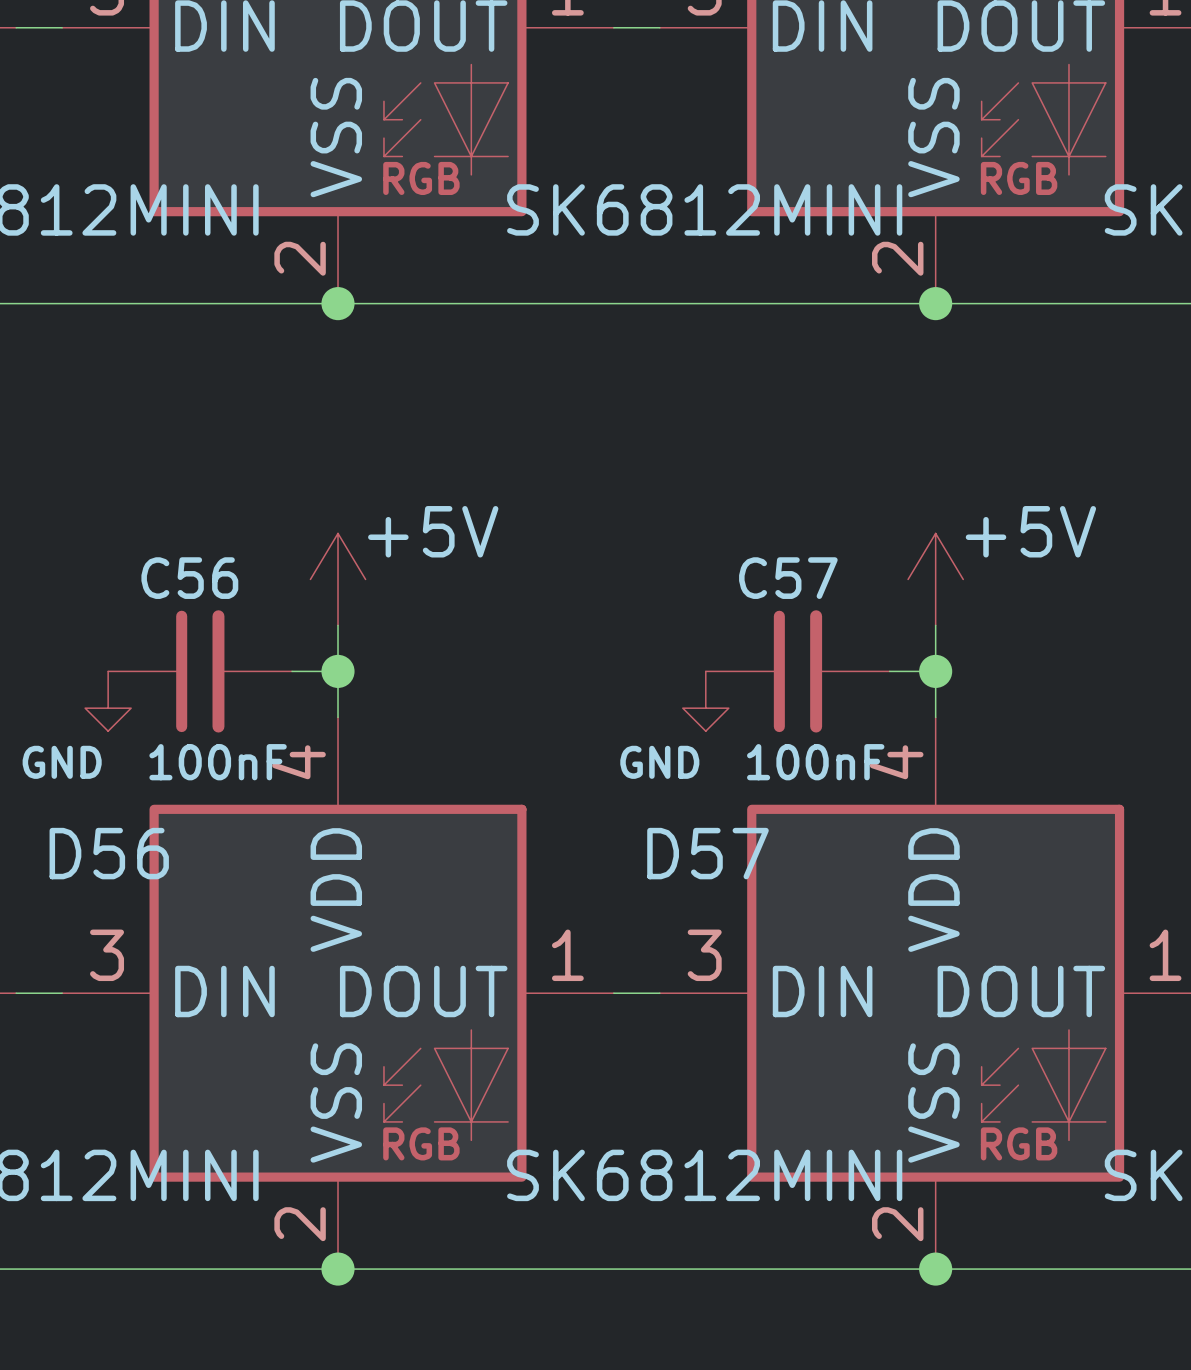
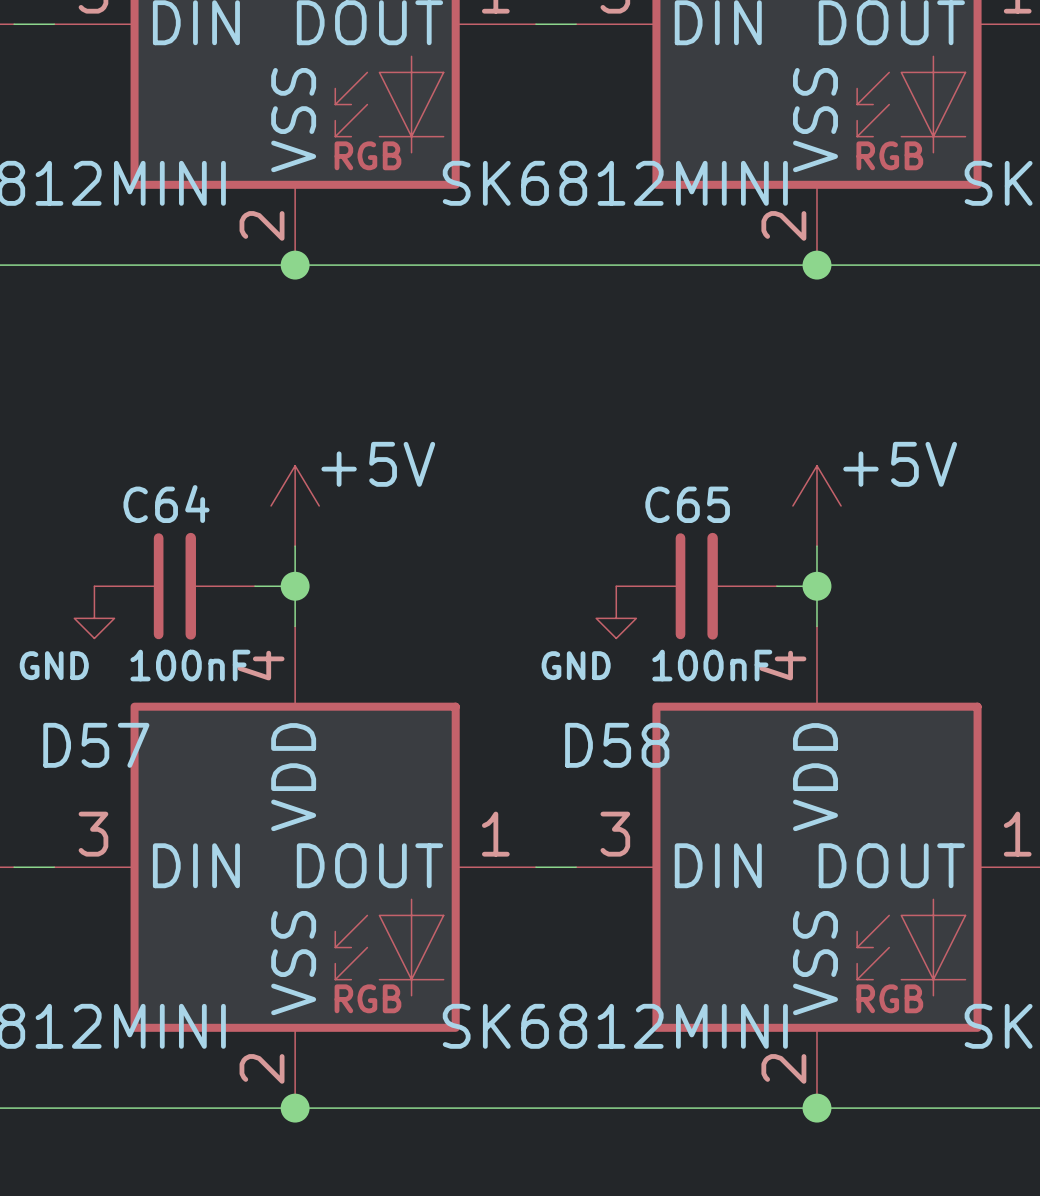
C56 name: C56 (189, 578) -> C64 (166, 504)
C57 name: C57 (788, 578) -> C65 (687, 504)
D56 name: D56 (109, 853) -> D57 (96, 745)
D57 name: D57 (707, 853) -> D58 (617, 745)

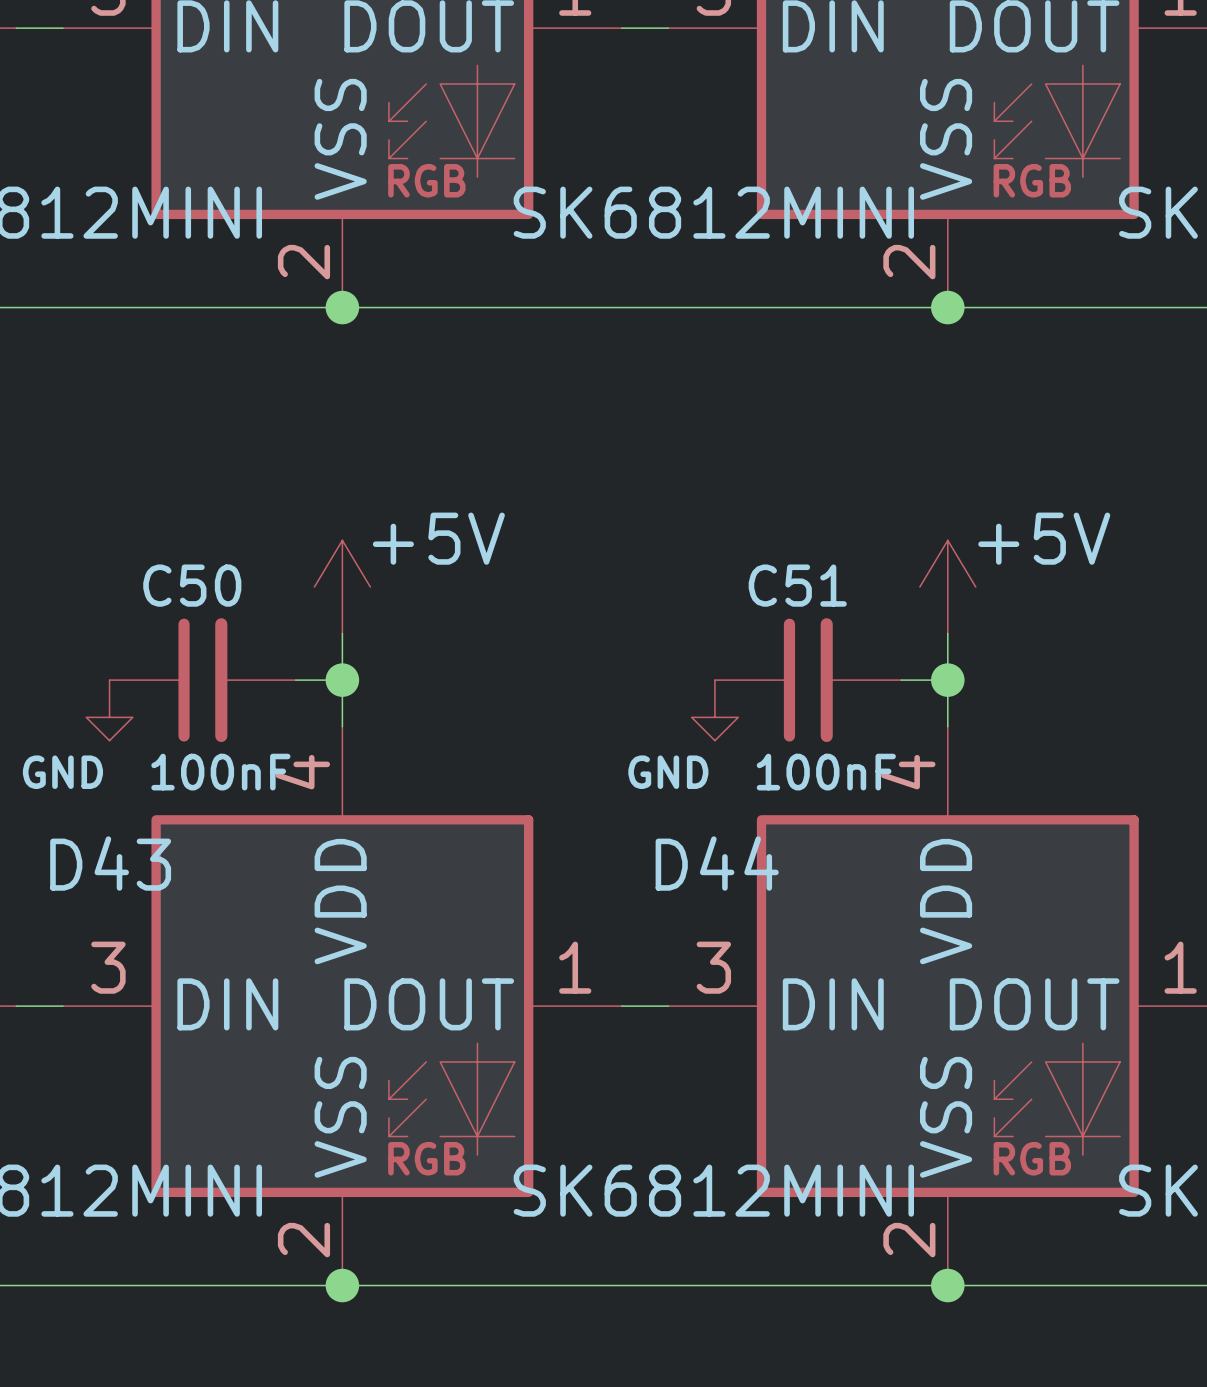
C64 name: C64 (166, 504) -> C50 (192, 585)
C65 name: C65 (687, 504) -> C51 (797, 585)
D57 name: D57 (96, 745) -> D43 (110, 863)
D58 name: D58 (617, 745) -> D44 (717, 863)

